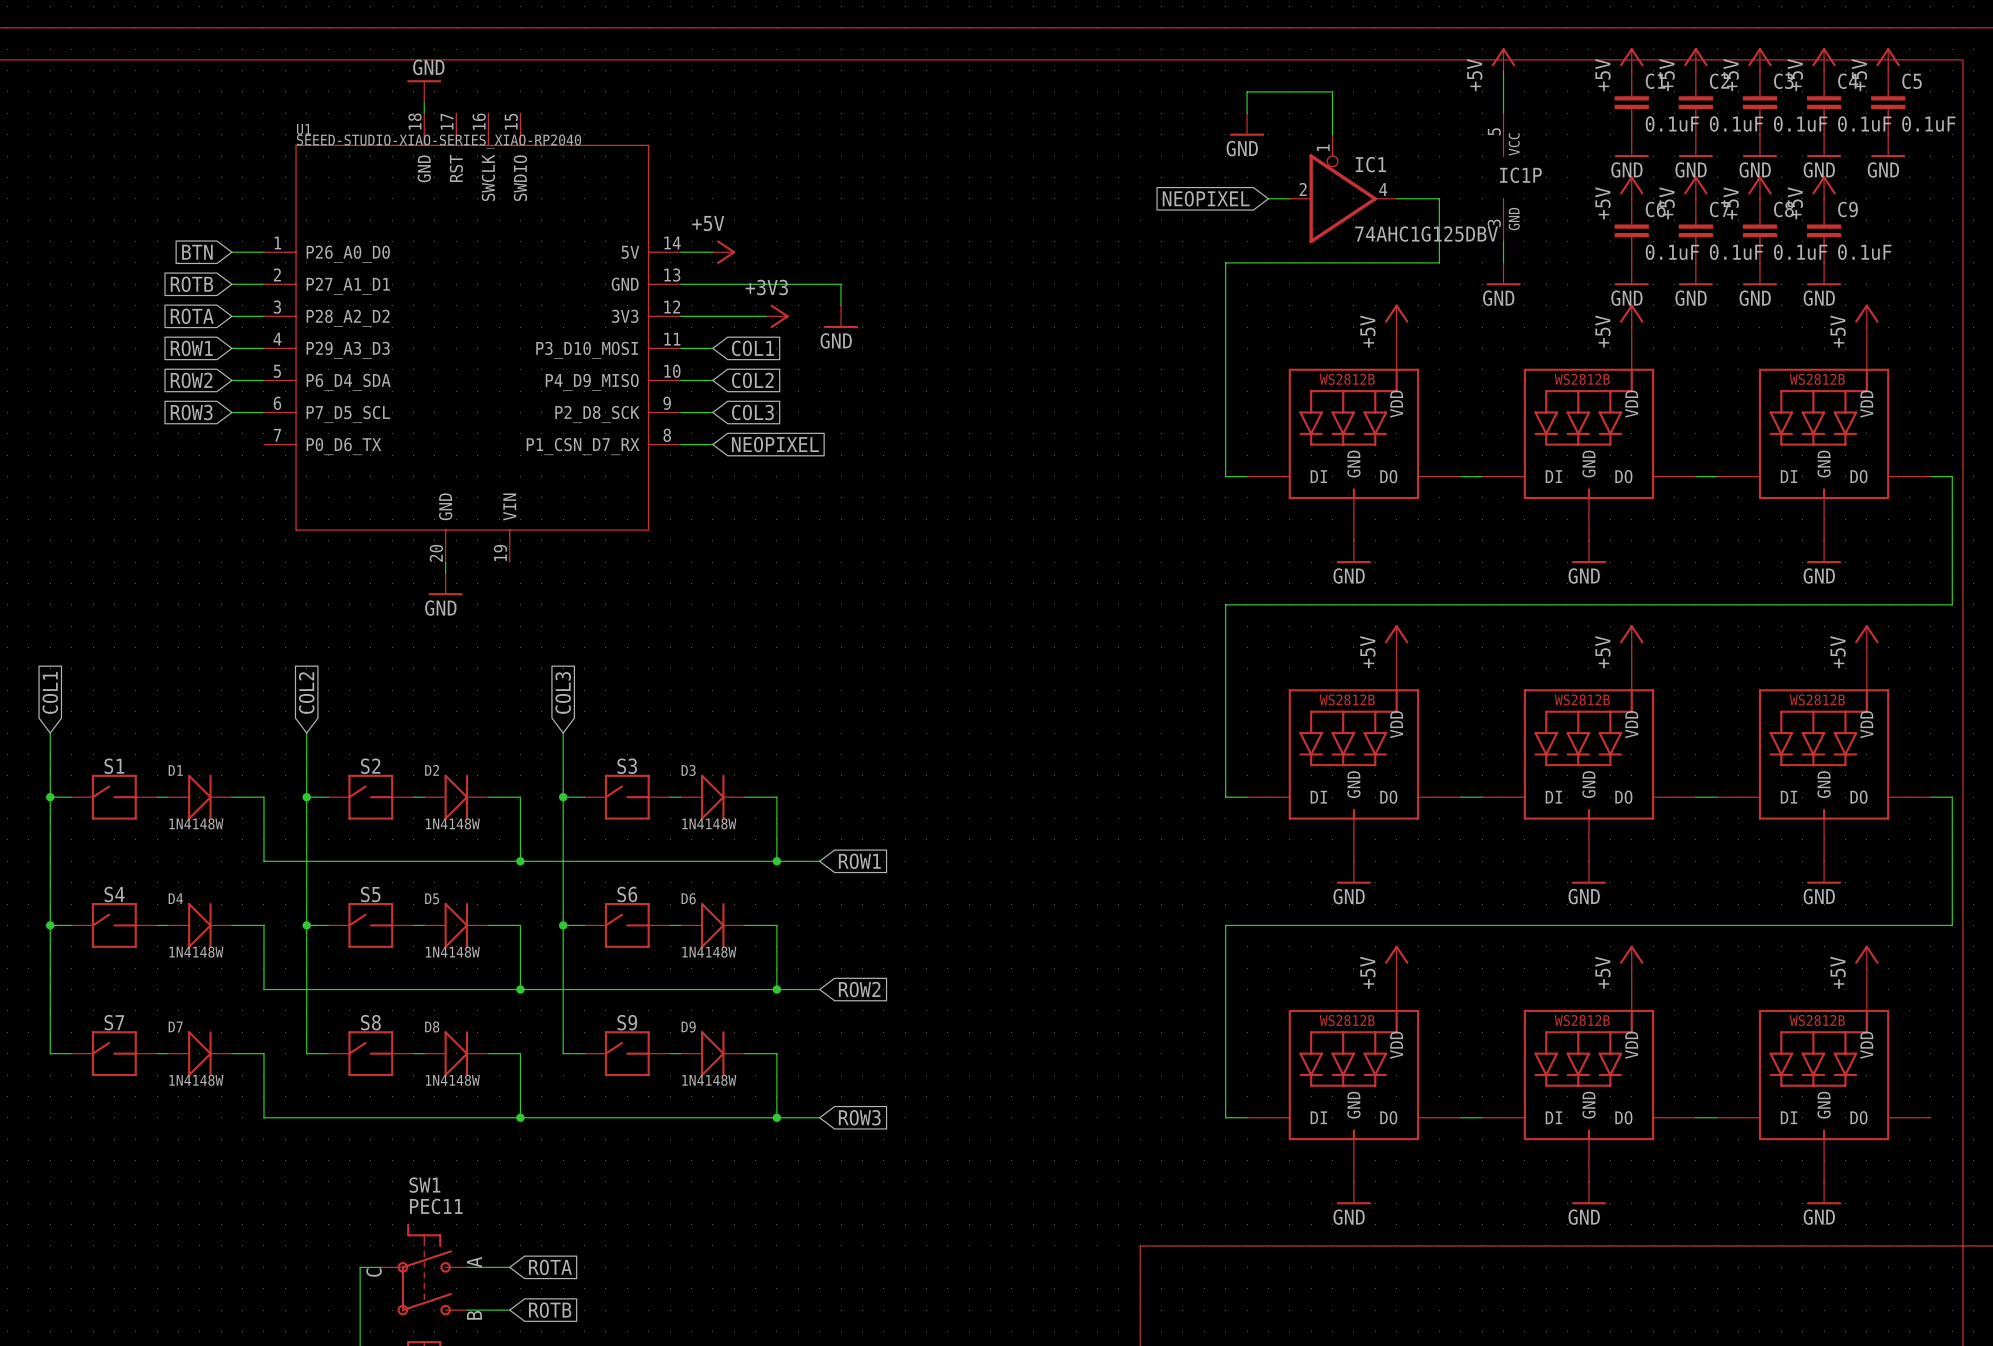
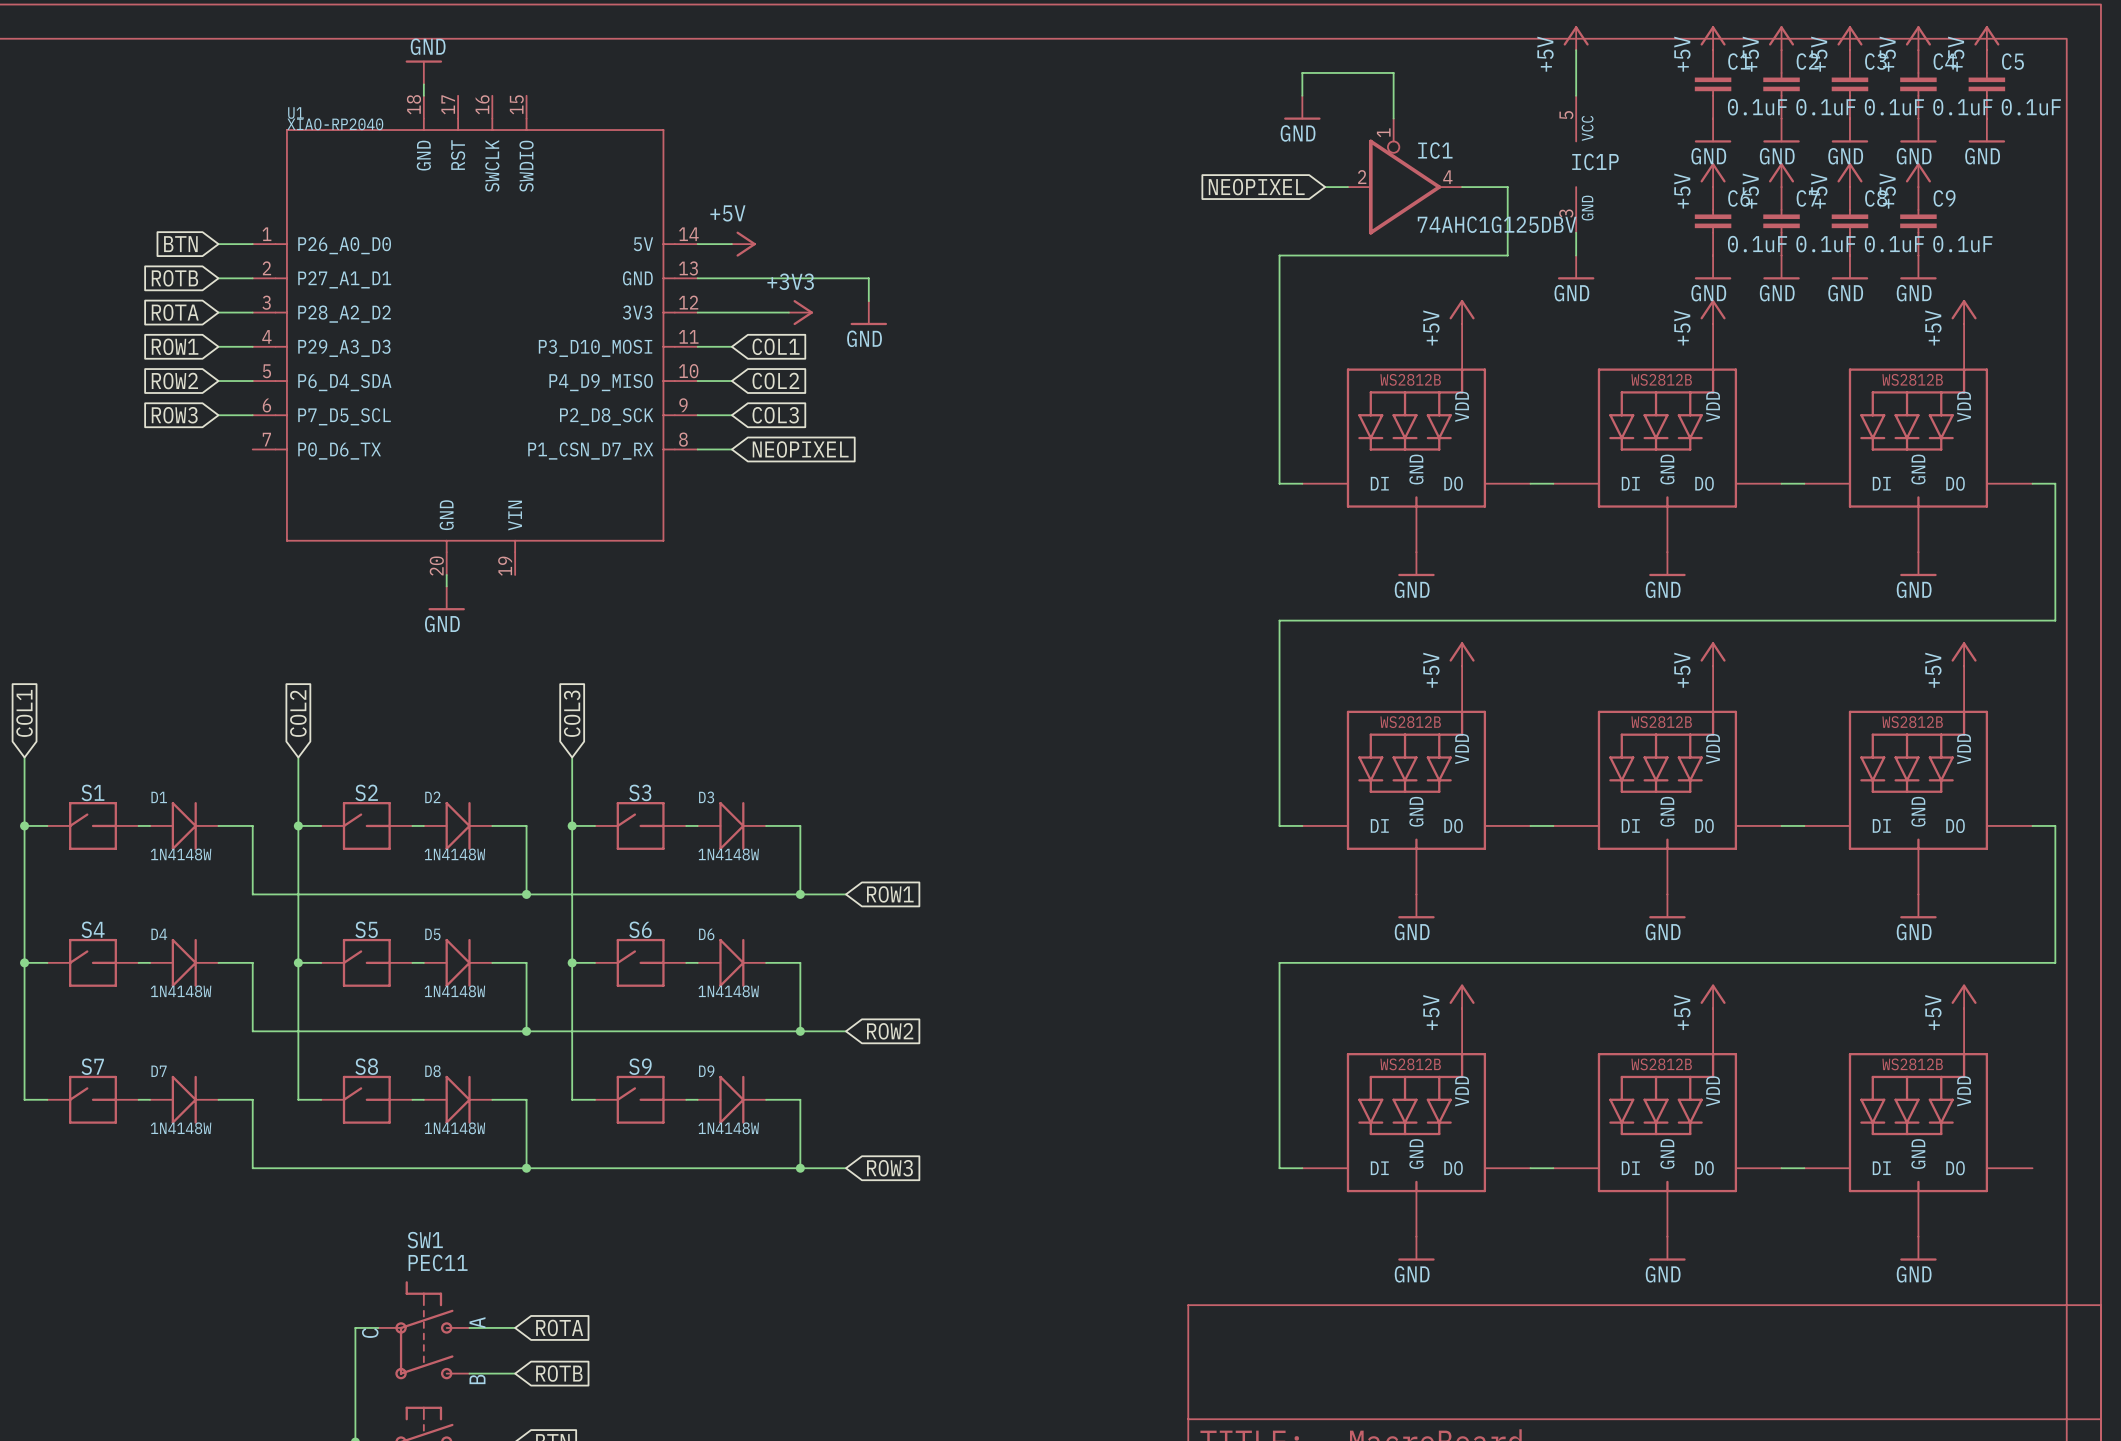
U1 value: SEEED-STUDIO-XIAO-SERIES_XIAO-RP2040 (439, 141) -> XIAO-RP2040 (335, 124)

